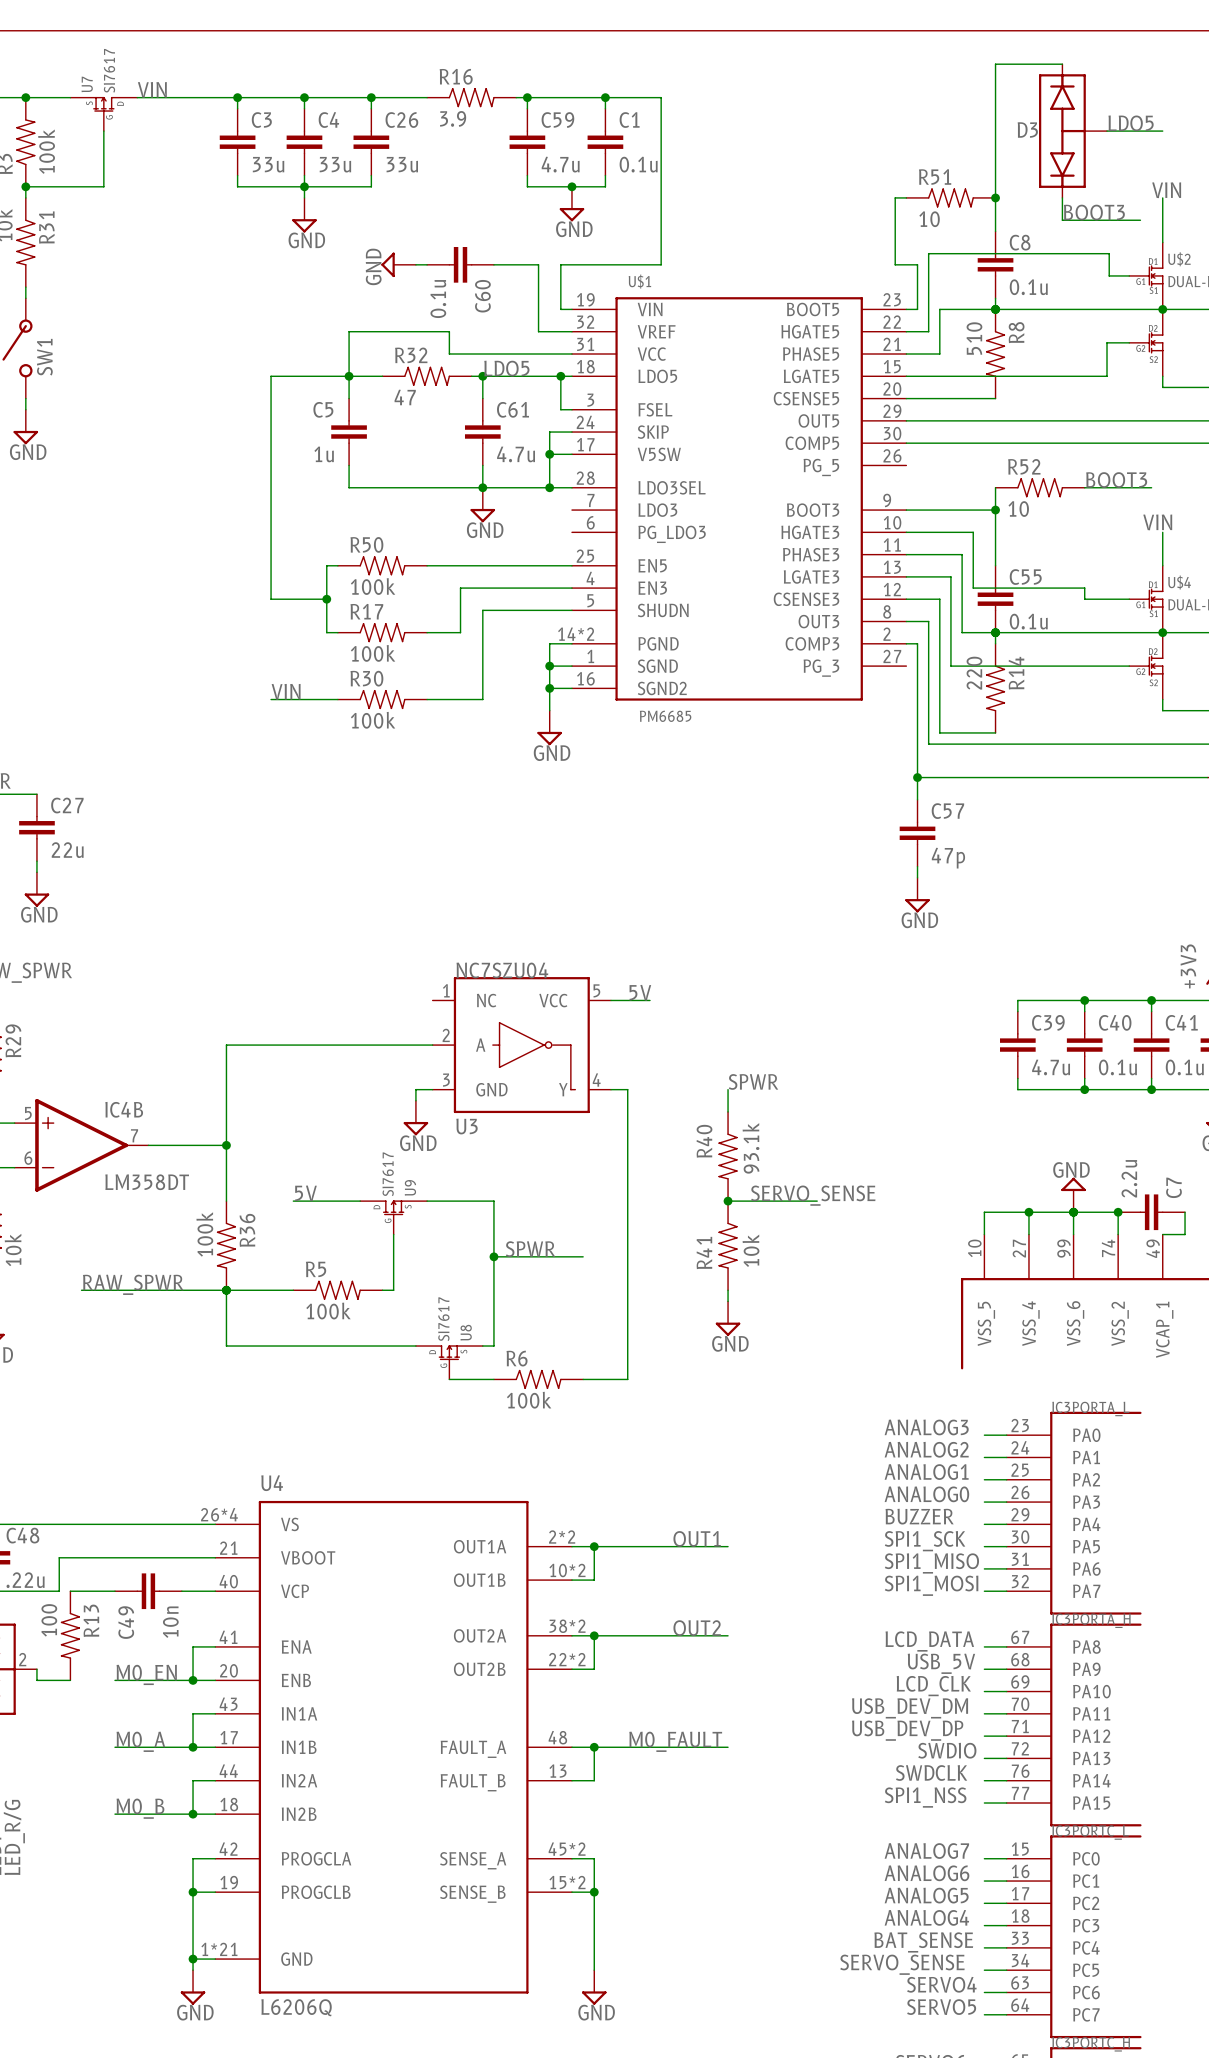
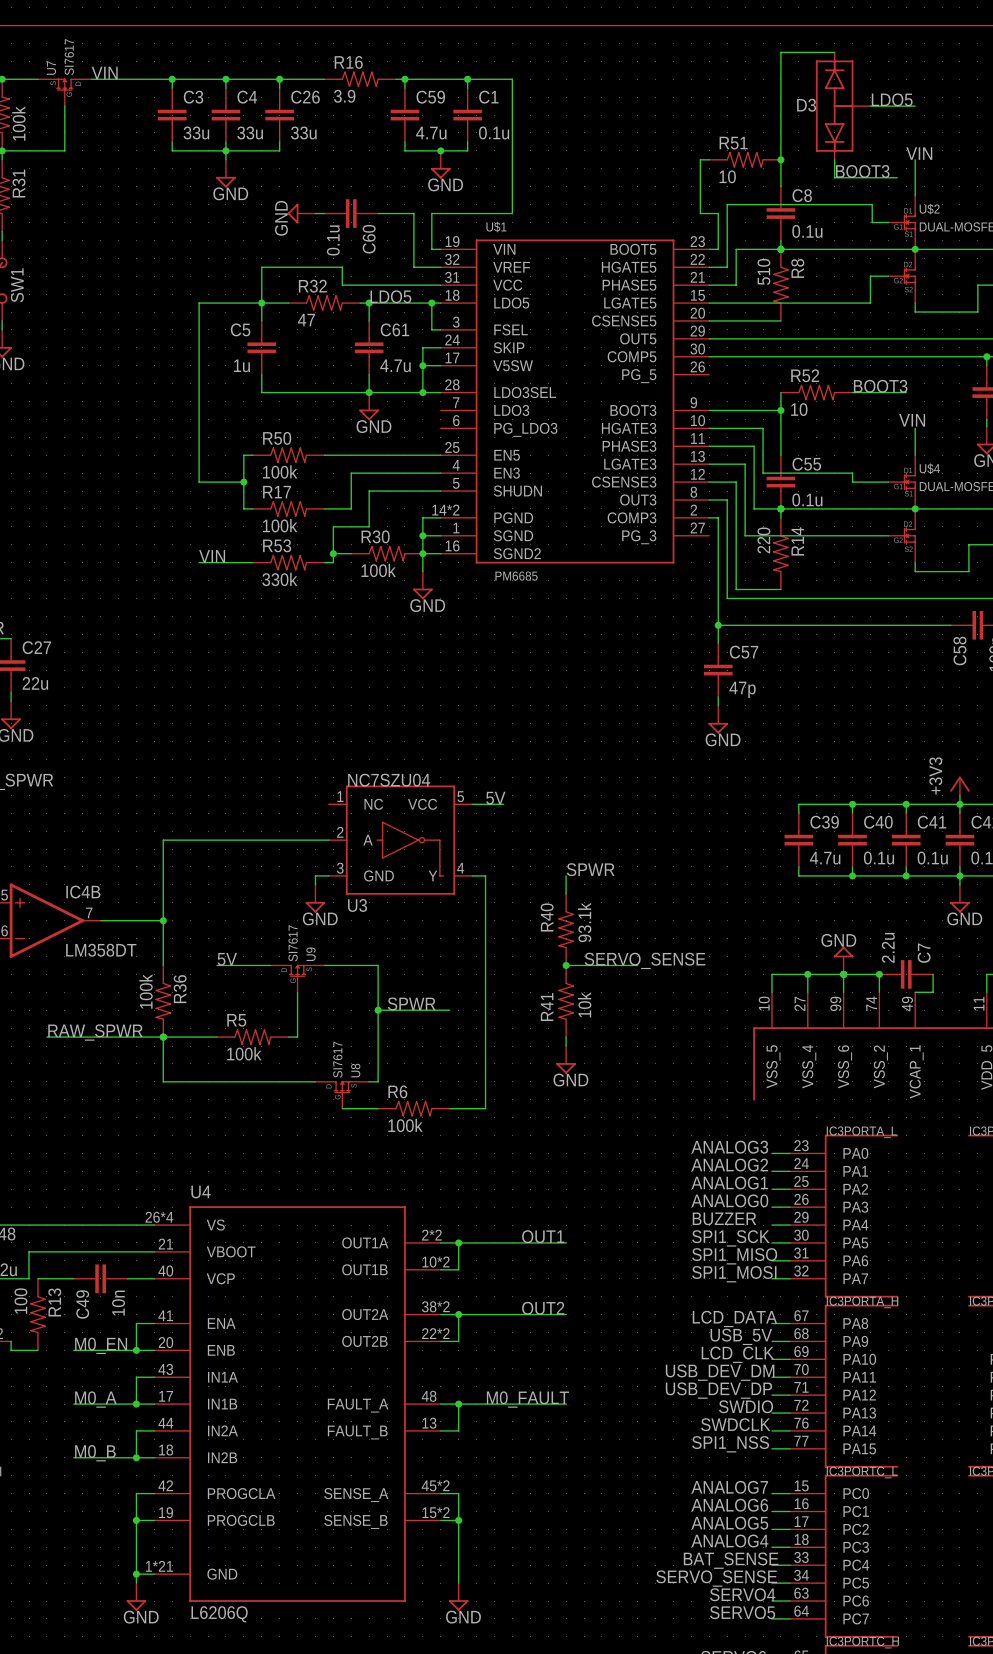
wire: (482, 654) (482, 699) (438, 699) -> (369, 526) (333, 526) (333, 562)
R30 name: R30 (366, 678) -> R53 (277, 545)
wire: none -> (333, 553) (351, 553)
junction: none -> (333, 553)
R30: none -> 100k (387, 553)
R30 value: 100k (373, 720) -> 330k (279, 579)

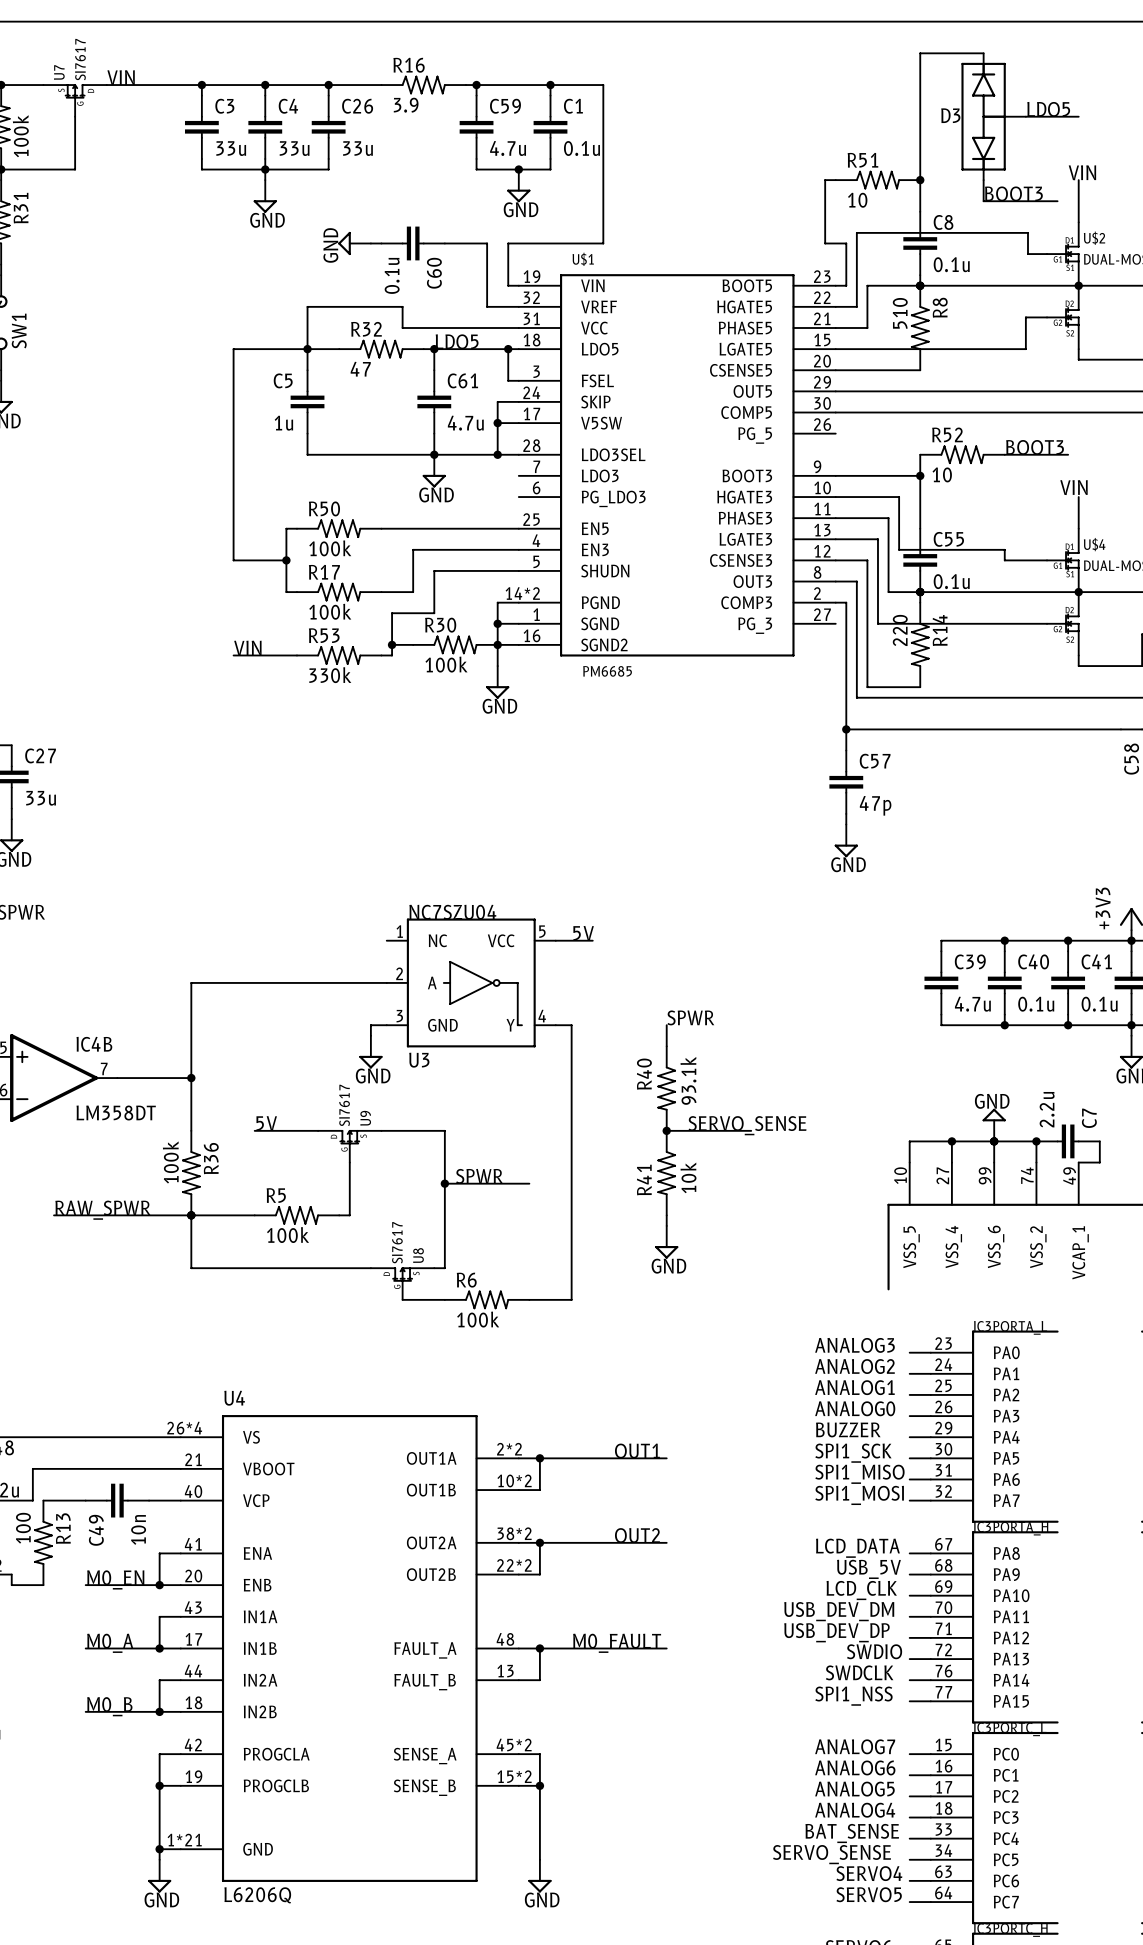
C27 value: 22u (35, 683) -> 33u (41, 798)

